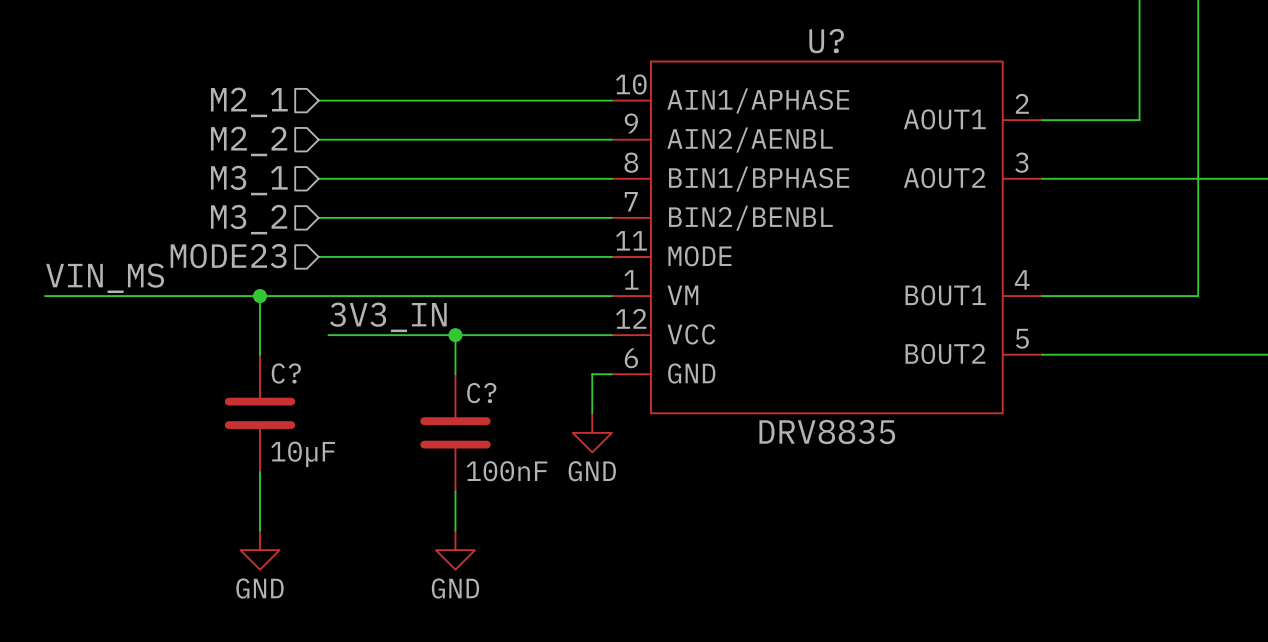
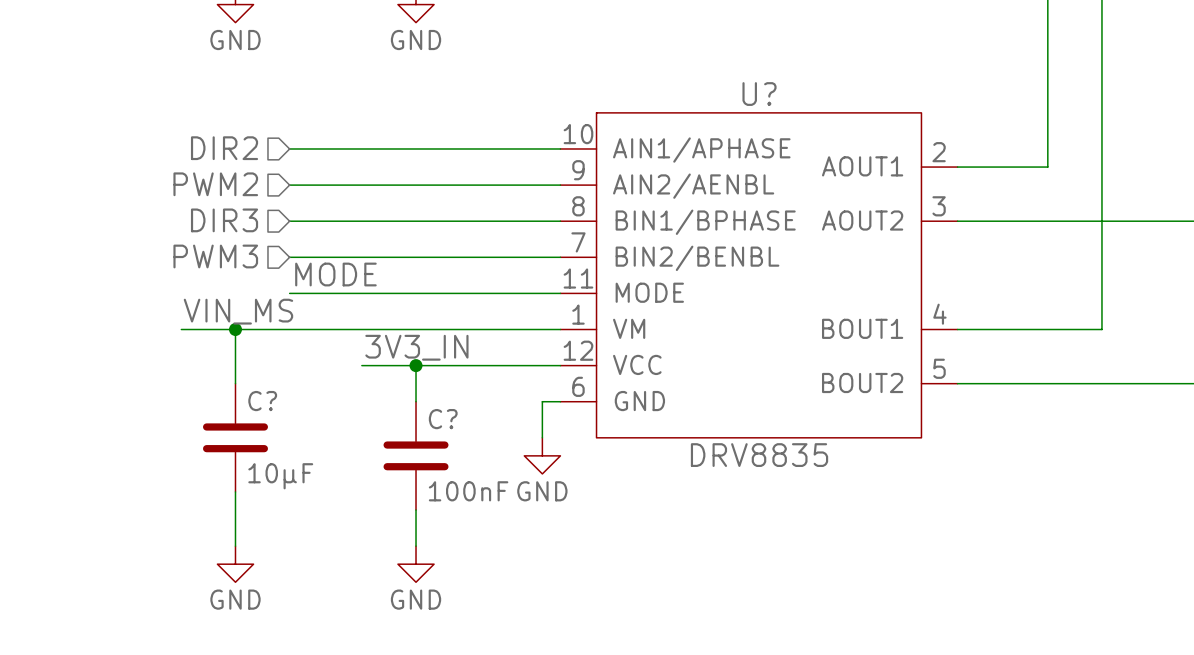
hierarchical label: M2_1 (249, 102) -> DIR2 (224, 148)
hierarchical label: M2_2 (249, 141) -> PWM2 (215, 184)
hierarchical label: M3_1 (249, 180) -> DIR3 (224, 220)
hierarchical label: M3_2 (249, 219) -> PWM3 (215, 256)
label: none -> MODE (335, 274)
hierarchical label: MODE23 (228, 256) -> none
label position: VIN_MS (105, 278) -> VIN_MS (238, 311)
wire: (45, 296) (201, 296) -> none
label position: 3V3_IN (388, 317) -> 3V3_IN (416, 347)
wire: (328, 335) (396, 335) -> none

